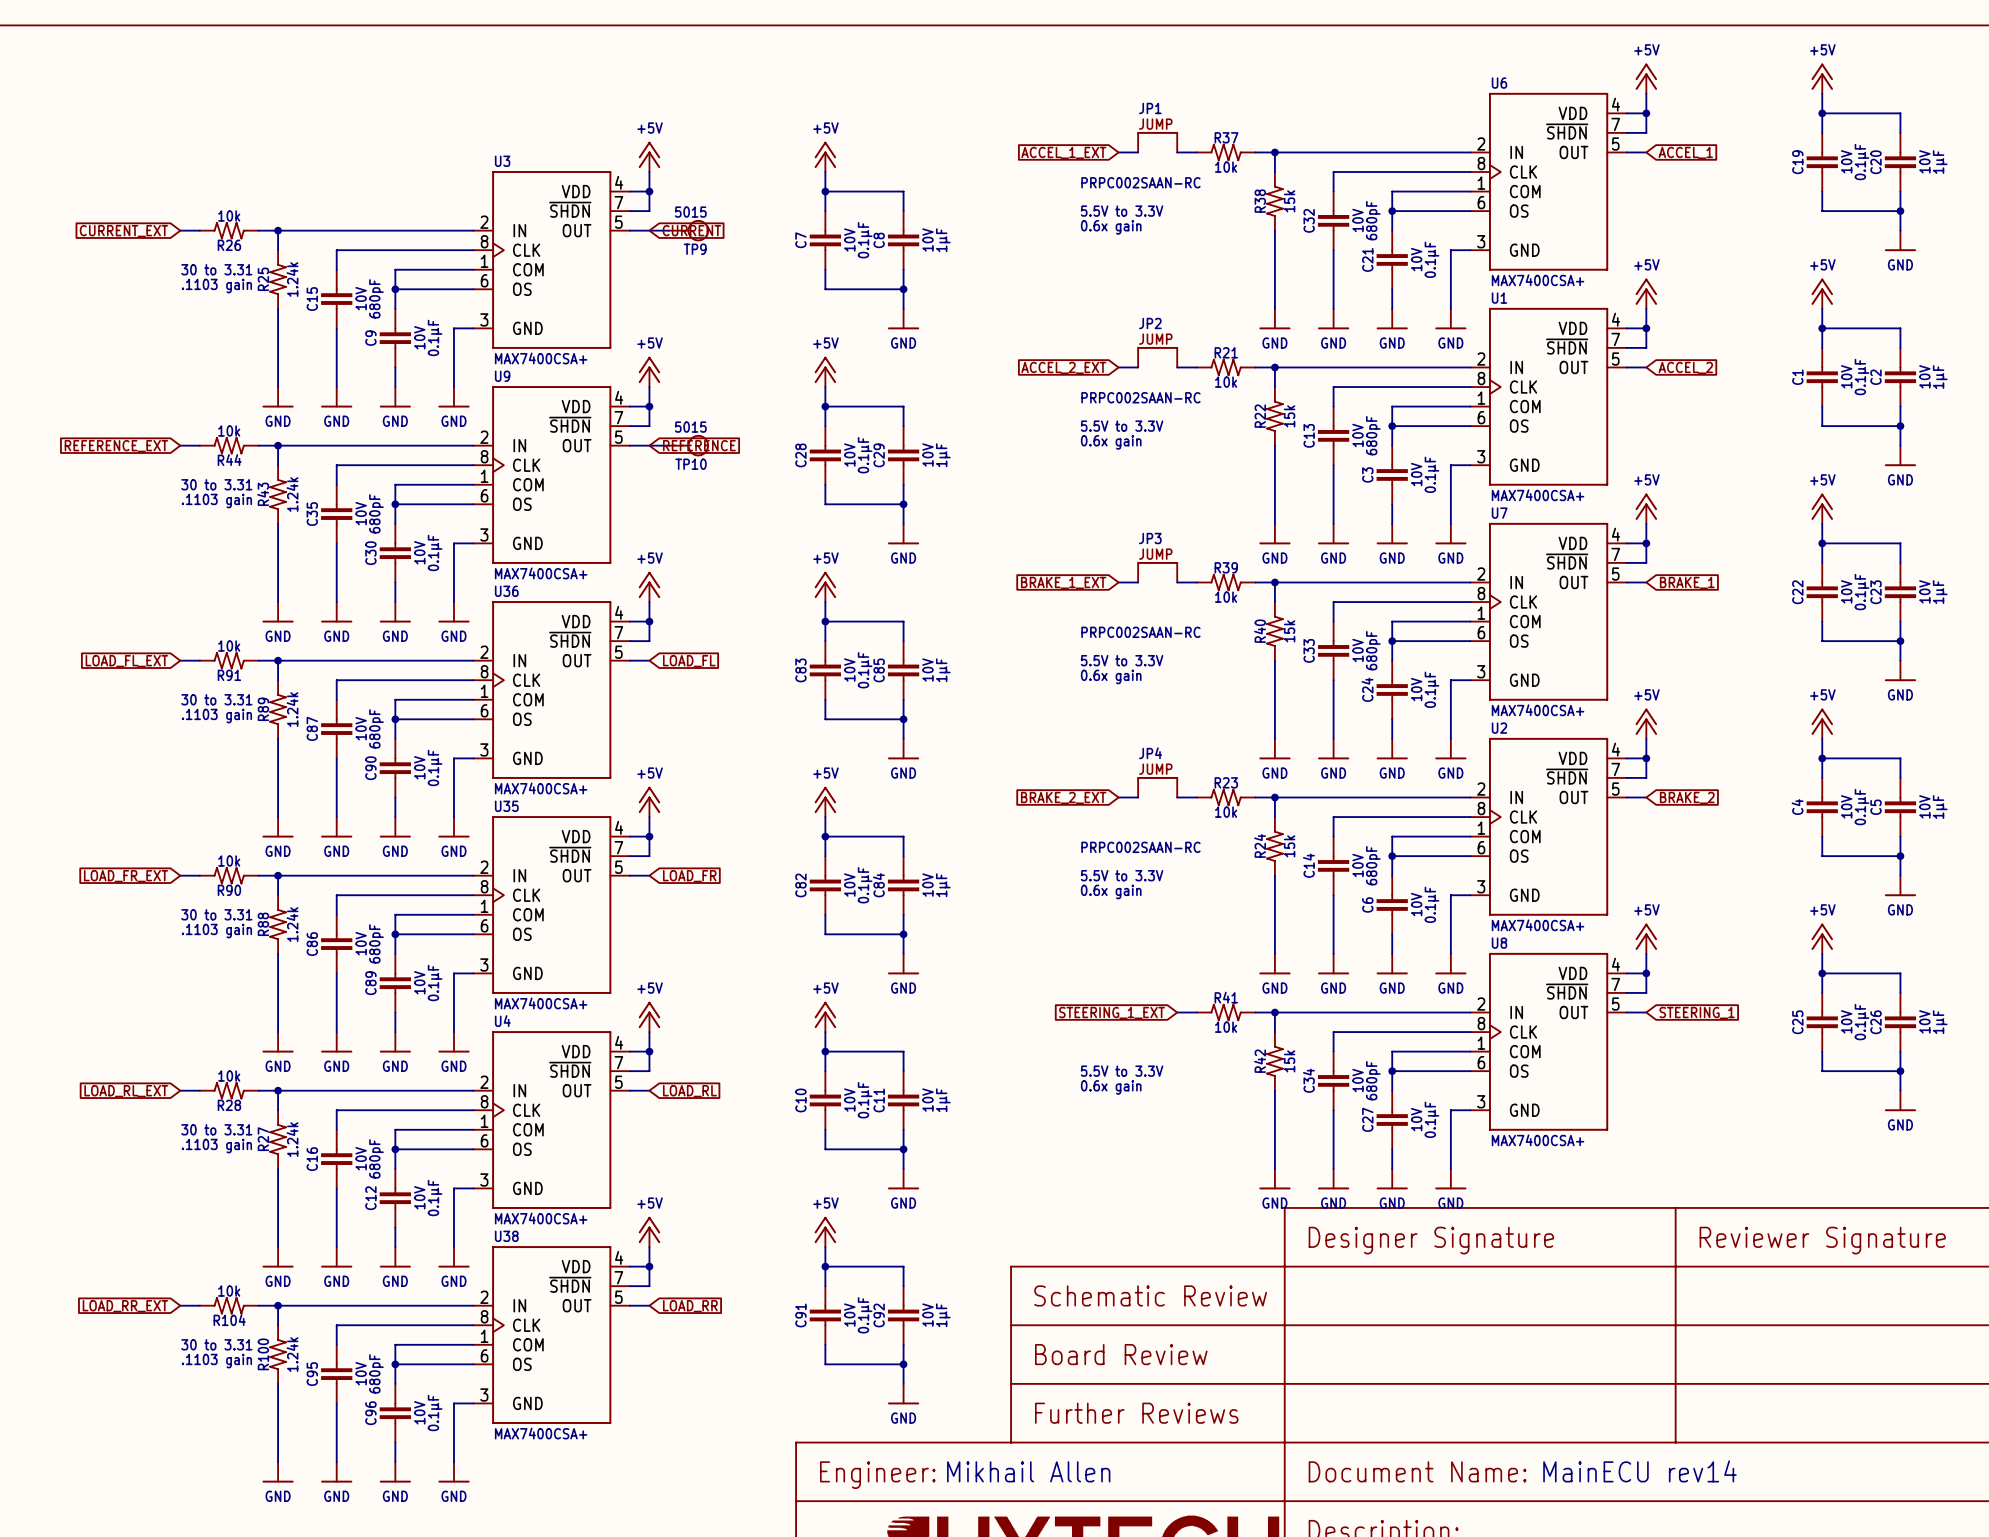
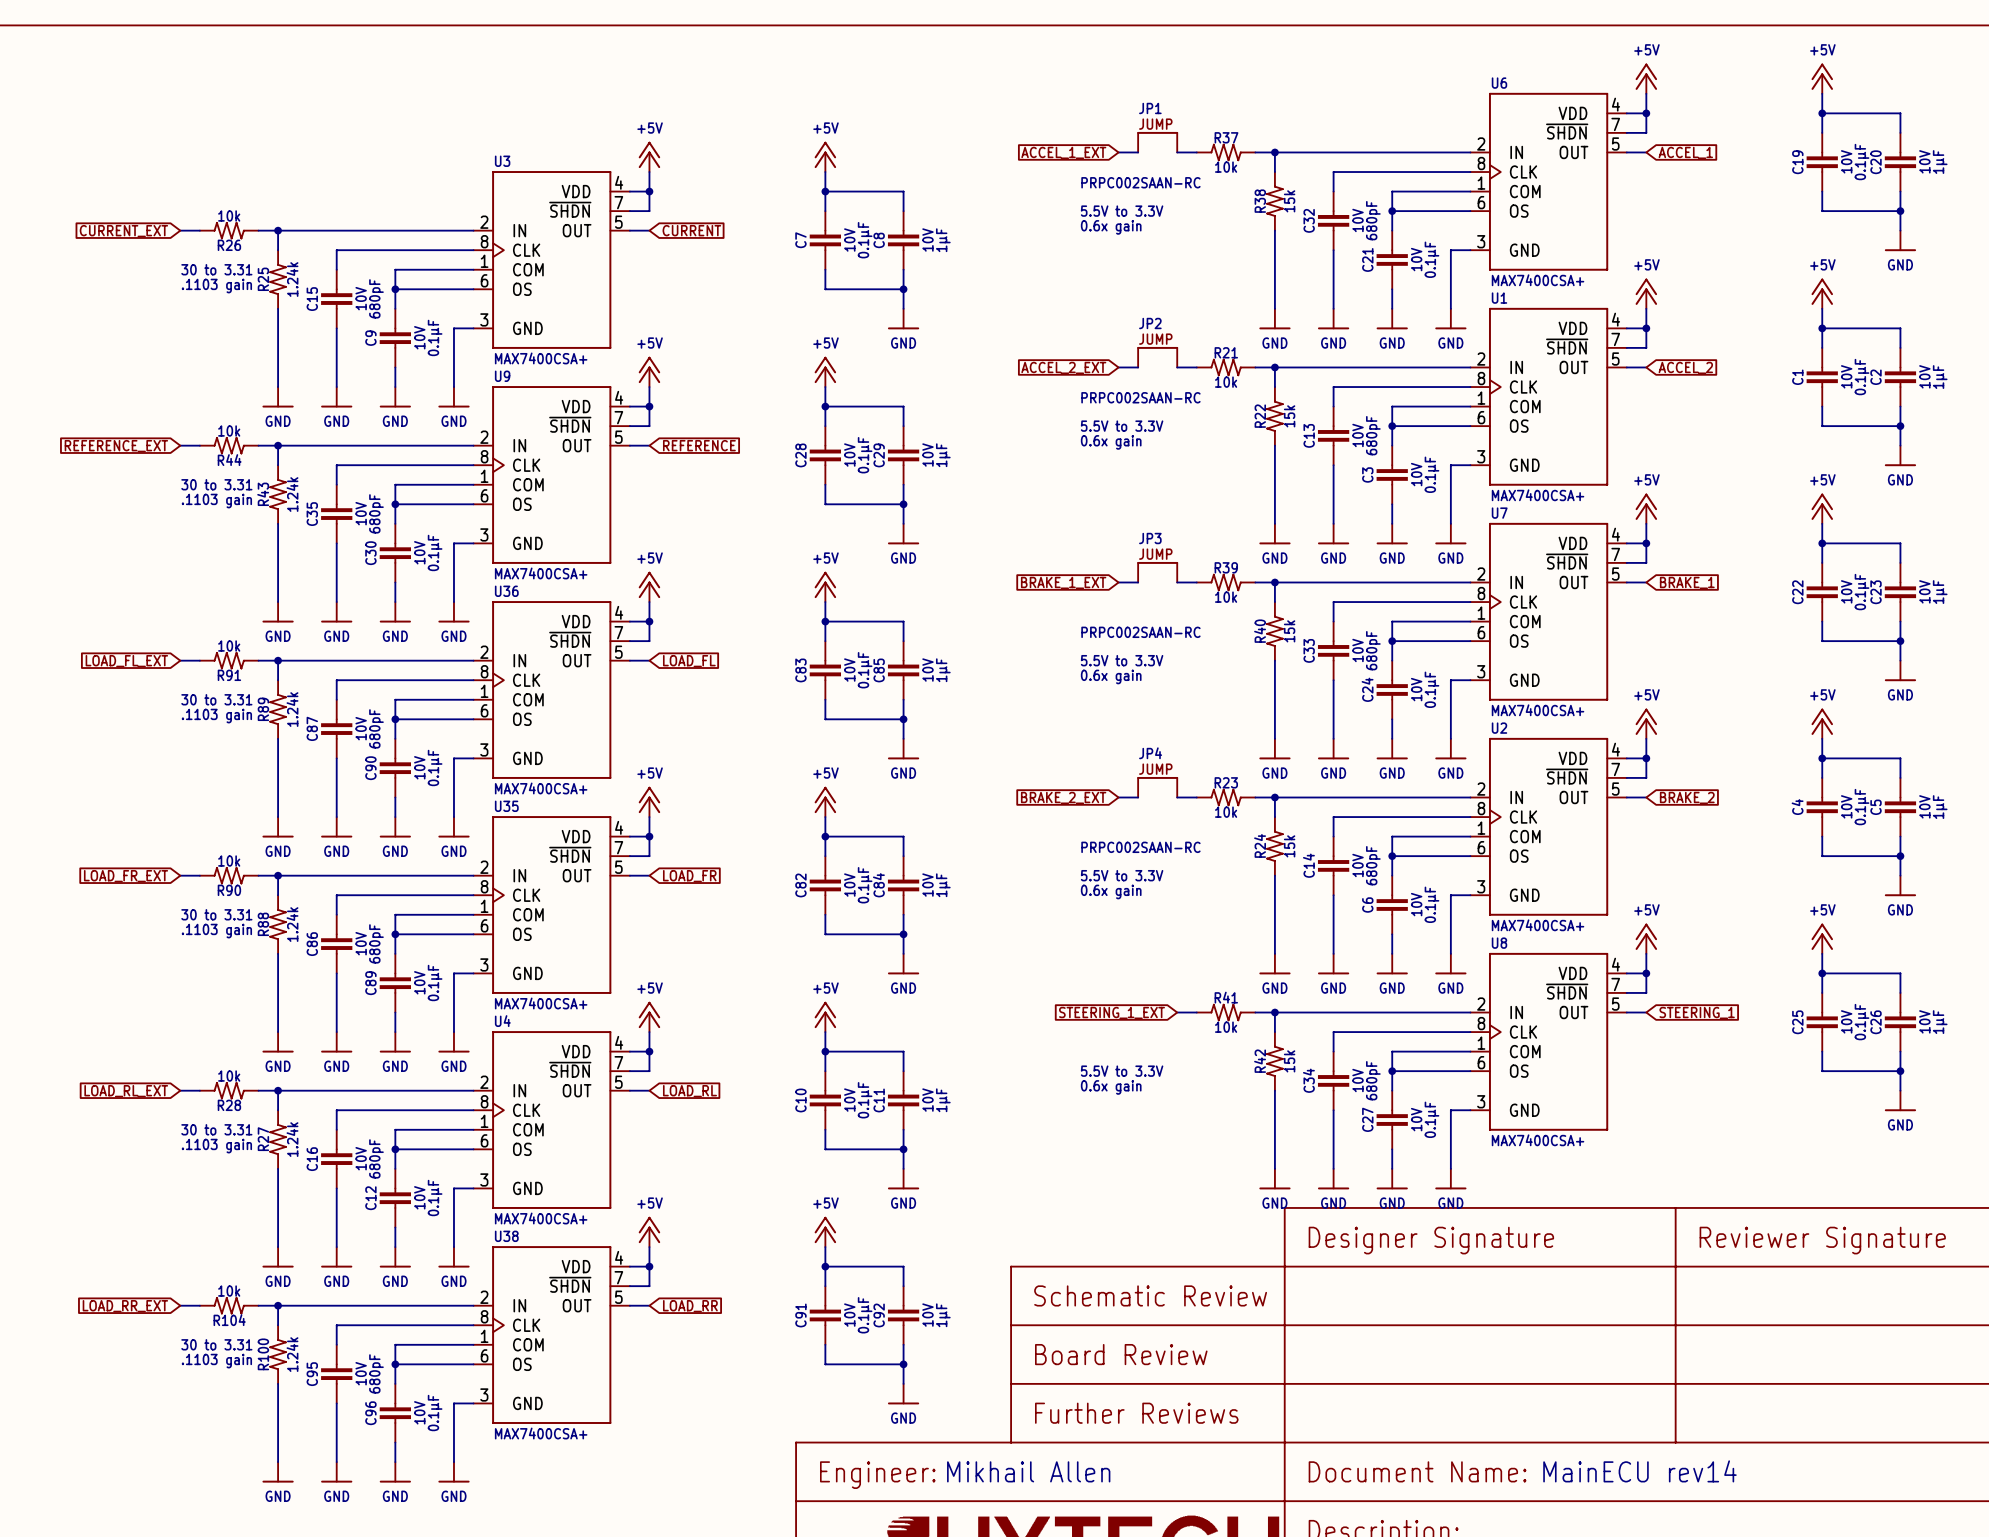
wire: (649, 230) (669, 230) -> none
TP9: (689, 230) -> none
wire: (649, 445) (669, 445) -> none
TP10: (689, 445) -> none

